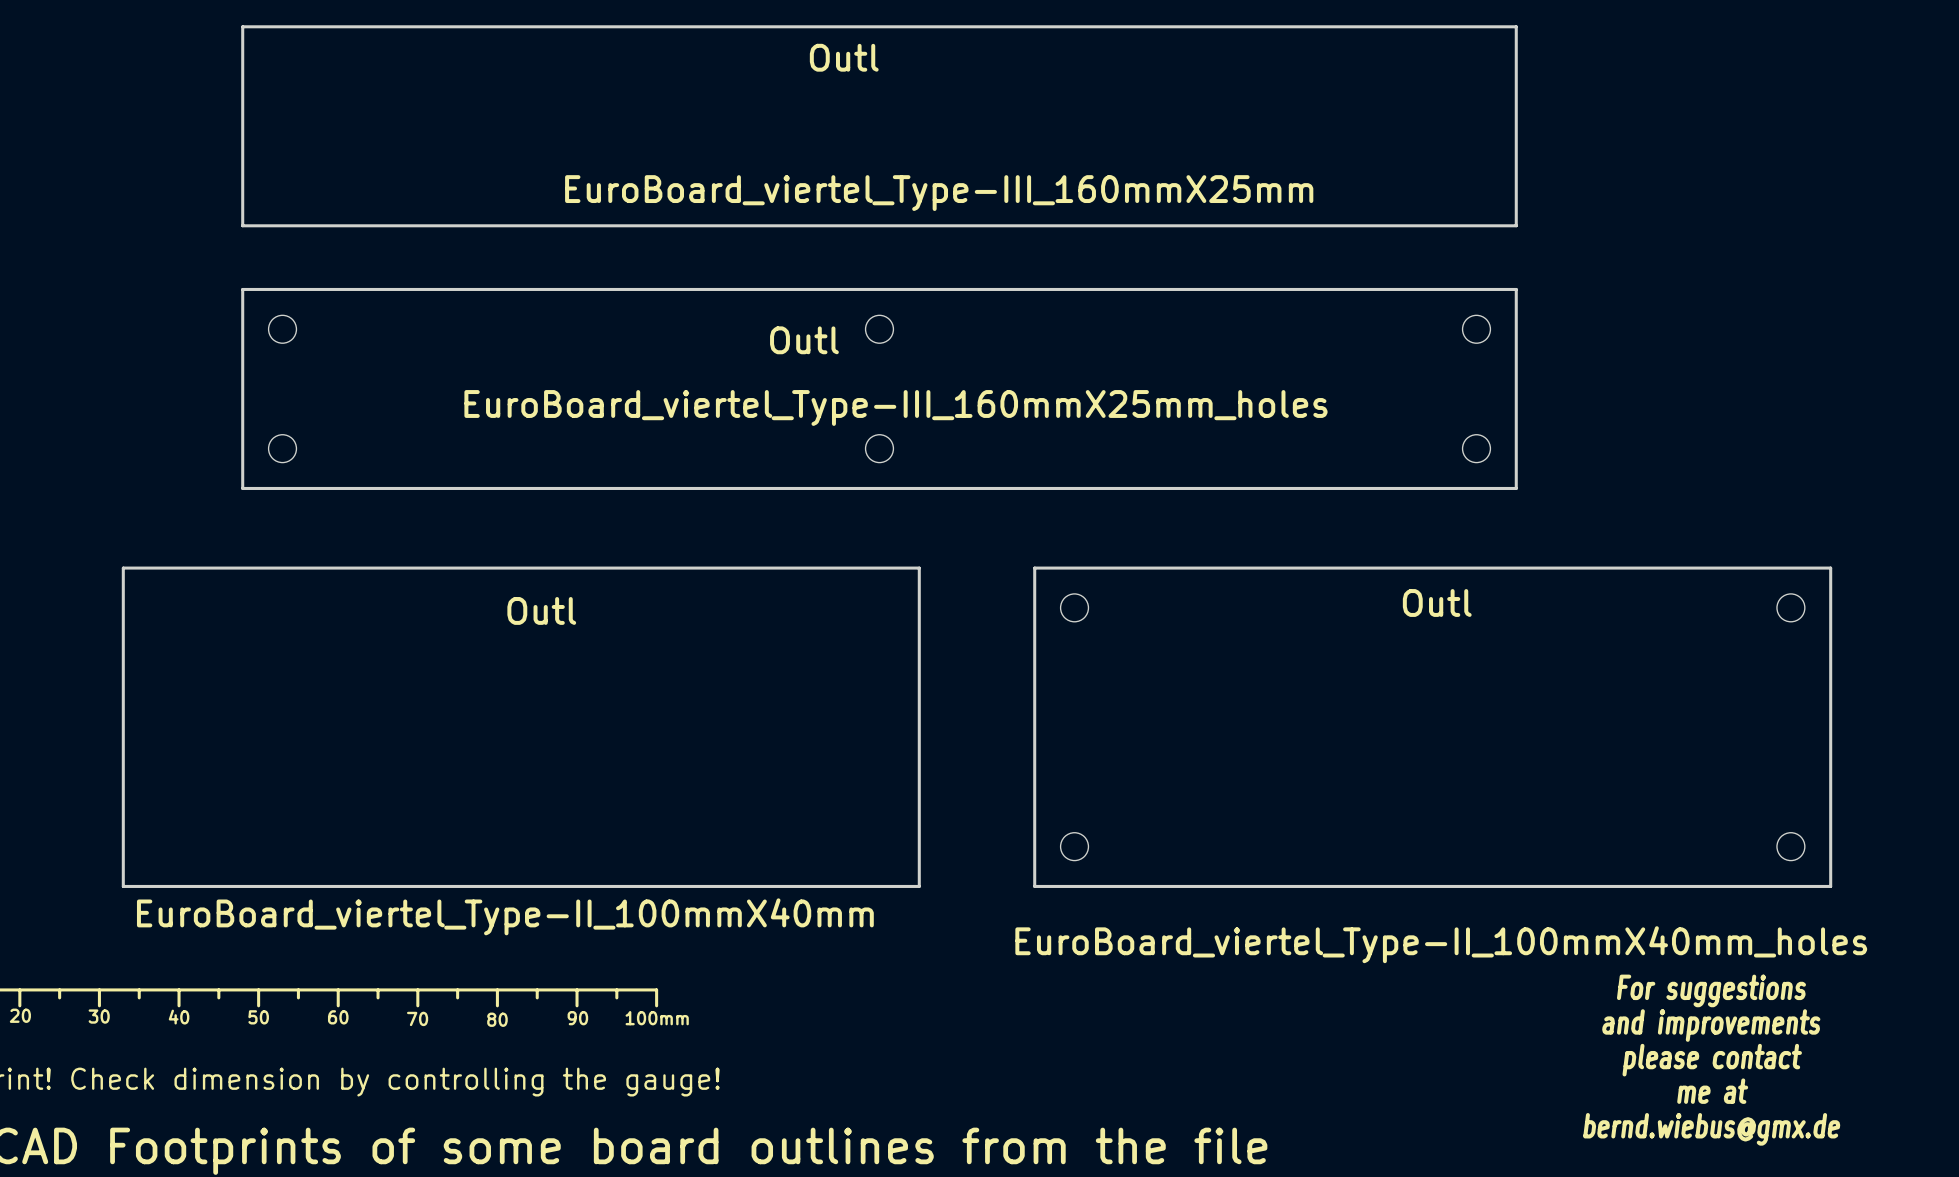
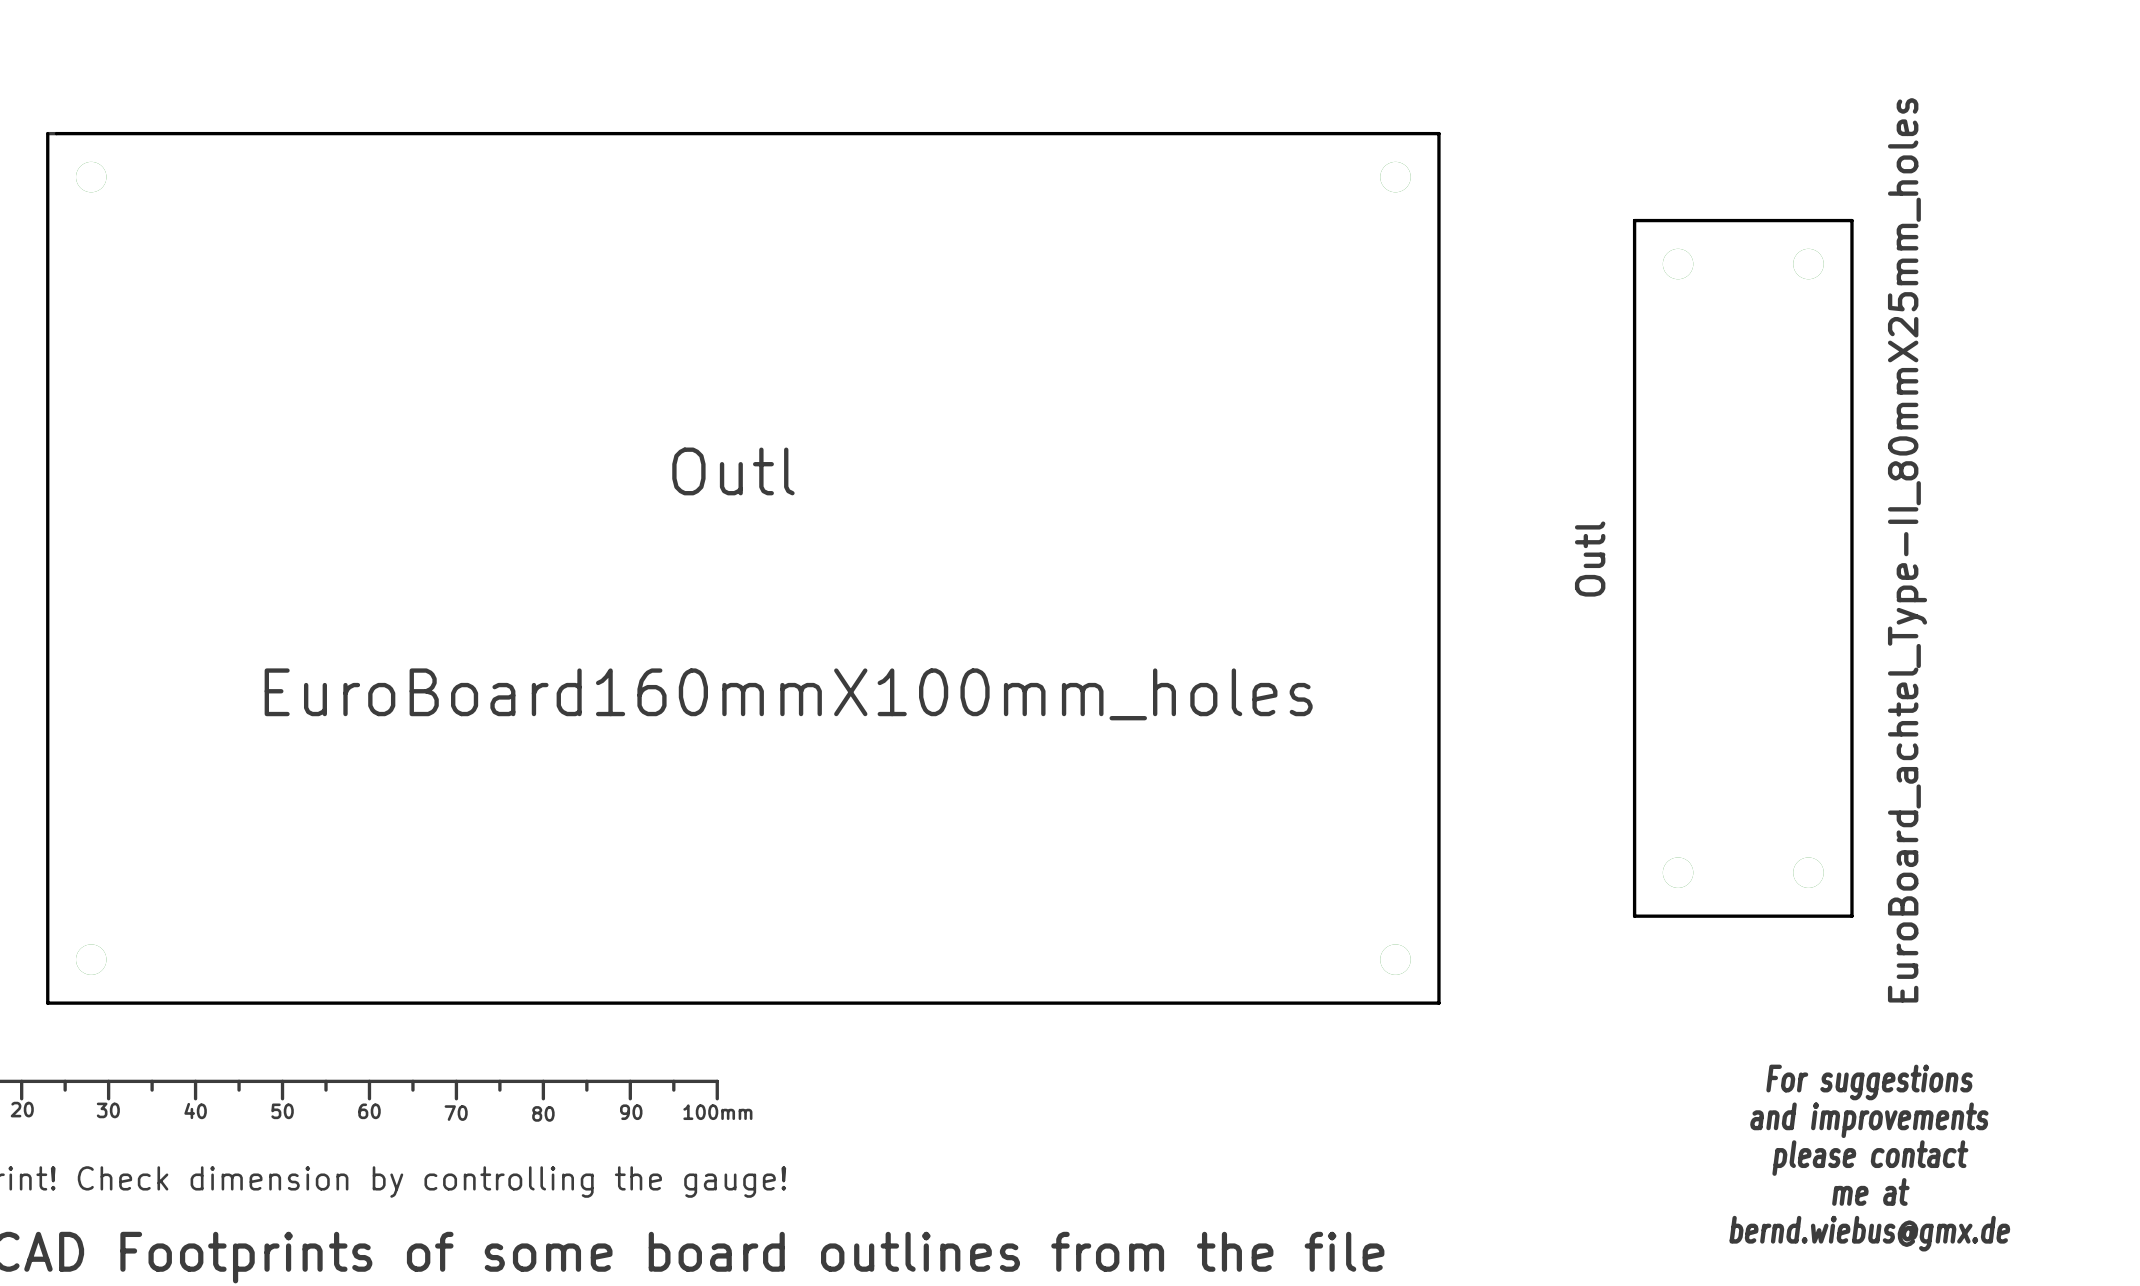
Outl: EuroBoard_viertel_Type-III_160mmX25mm (879, 126) -> none
Outl: EuroBoard_viertel_Type-III_160mmX25mm_holes (879, 388) -> none
Outl: none -> EuroBoard160mmX100mm_holes (743, 568)
Outl: none -> EuroBoard_achtel_Type-II_80mmX25mm_holes (1743, 568)
Outl: EuroBoard_viertel_Type-II_100mmX40mm (521, 727) -> none
Outl: EuroBoard_viertel_Type-II_100mmX40mm_holes (1432, 727) -> none

